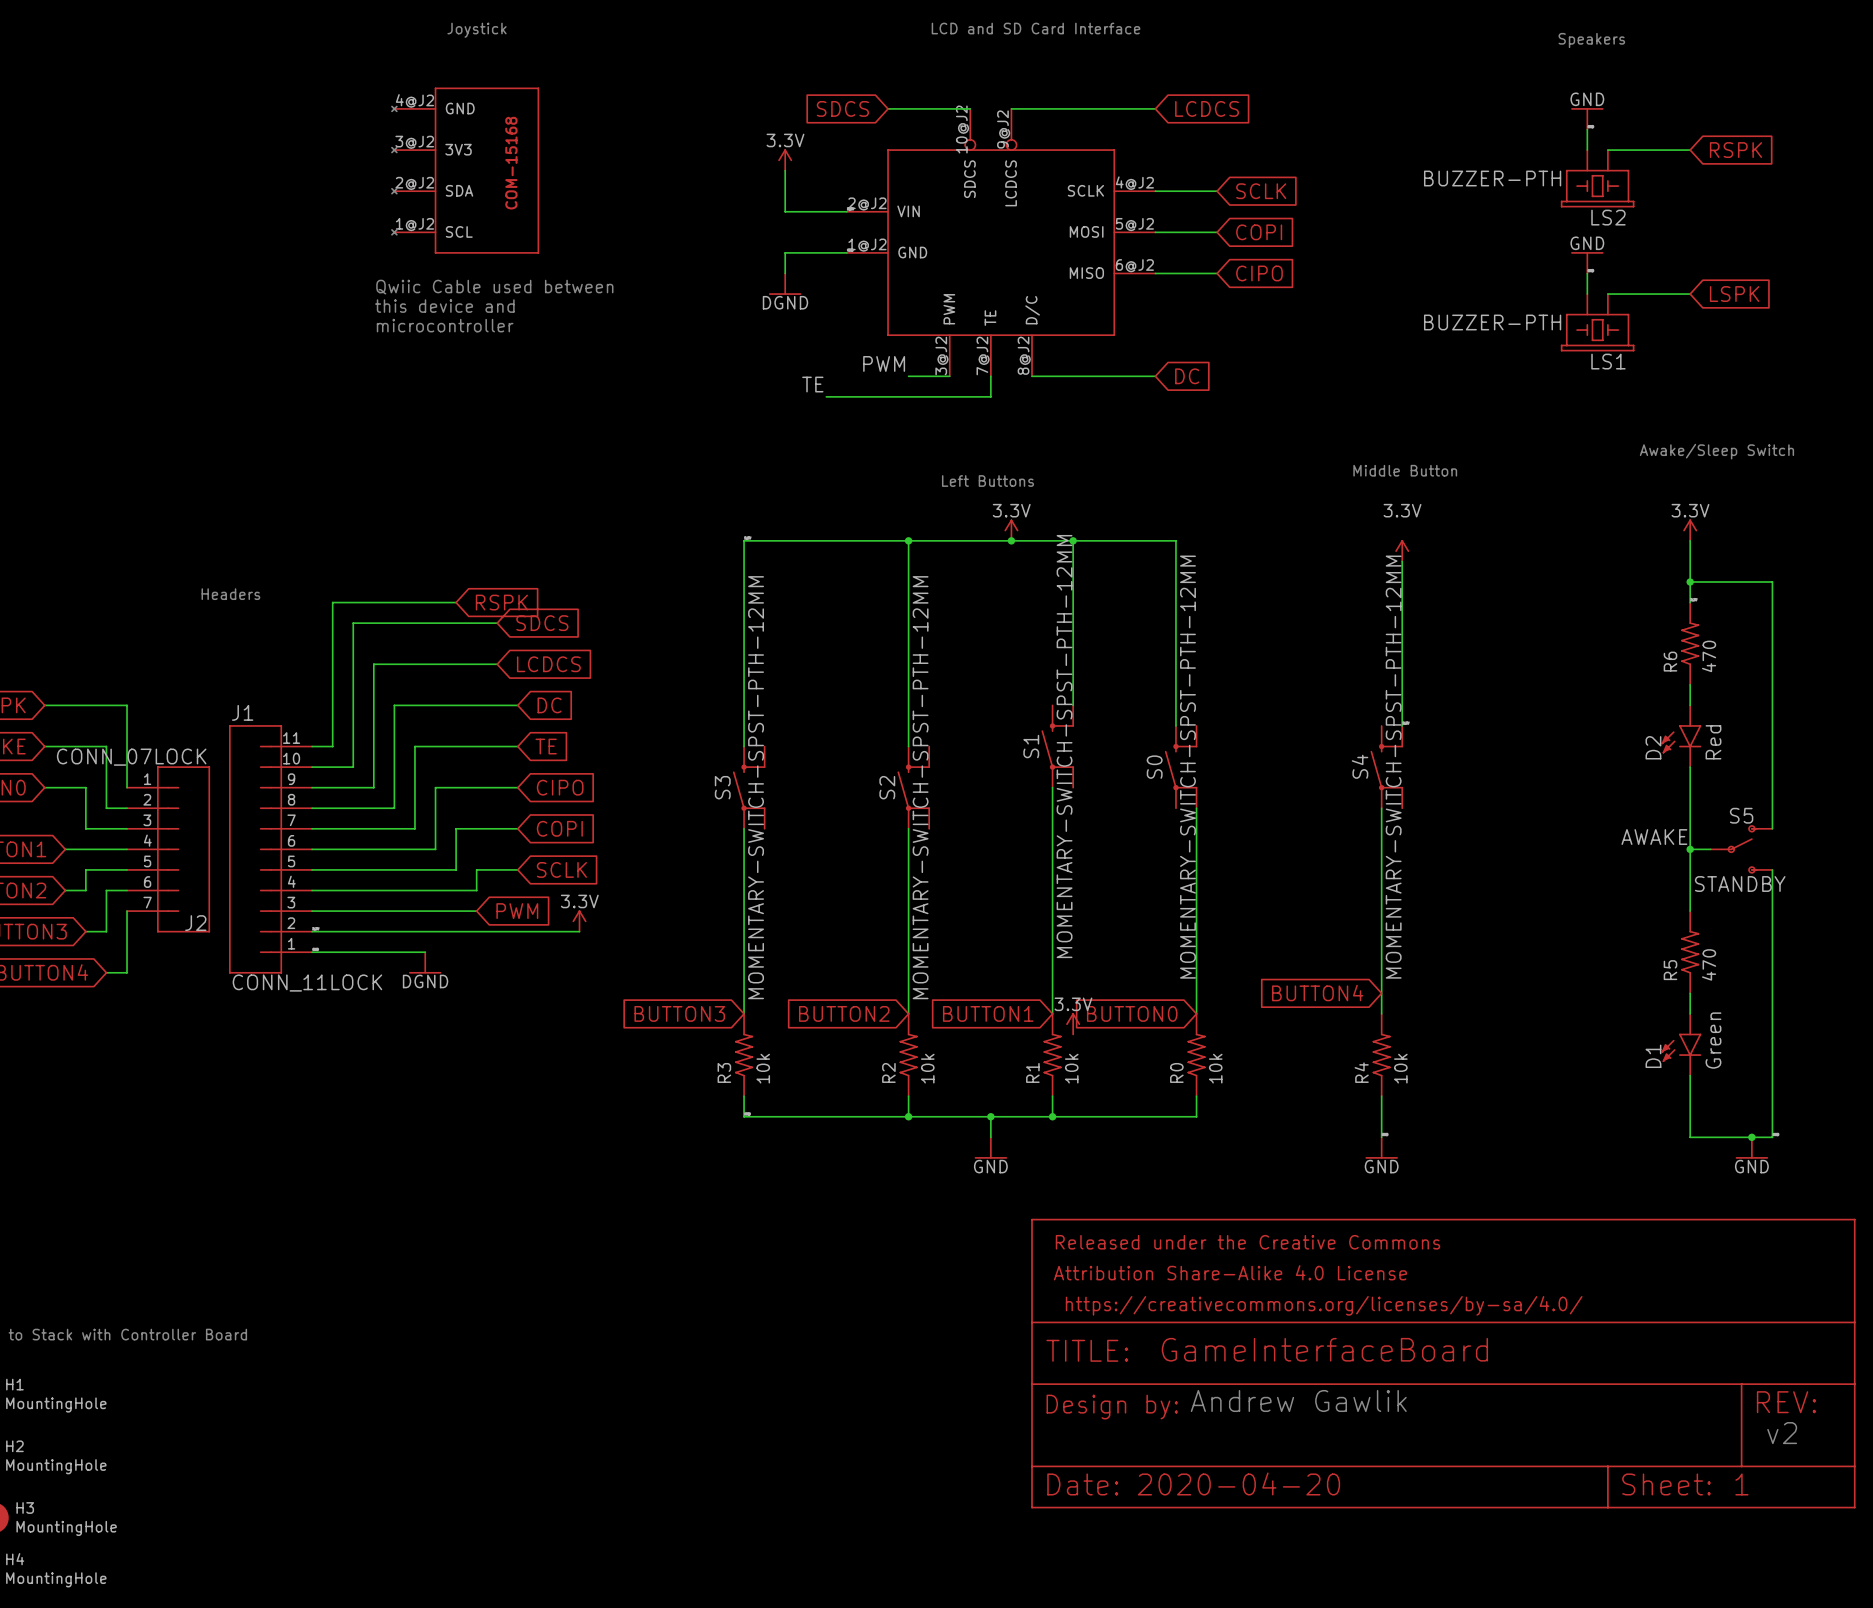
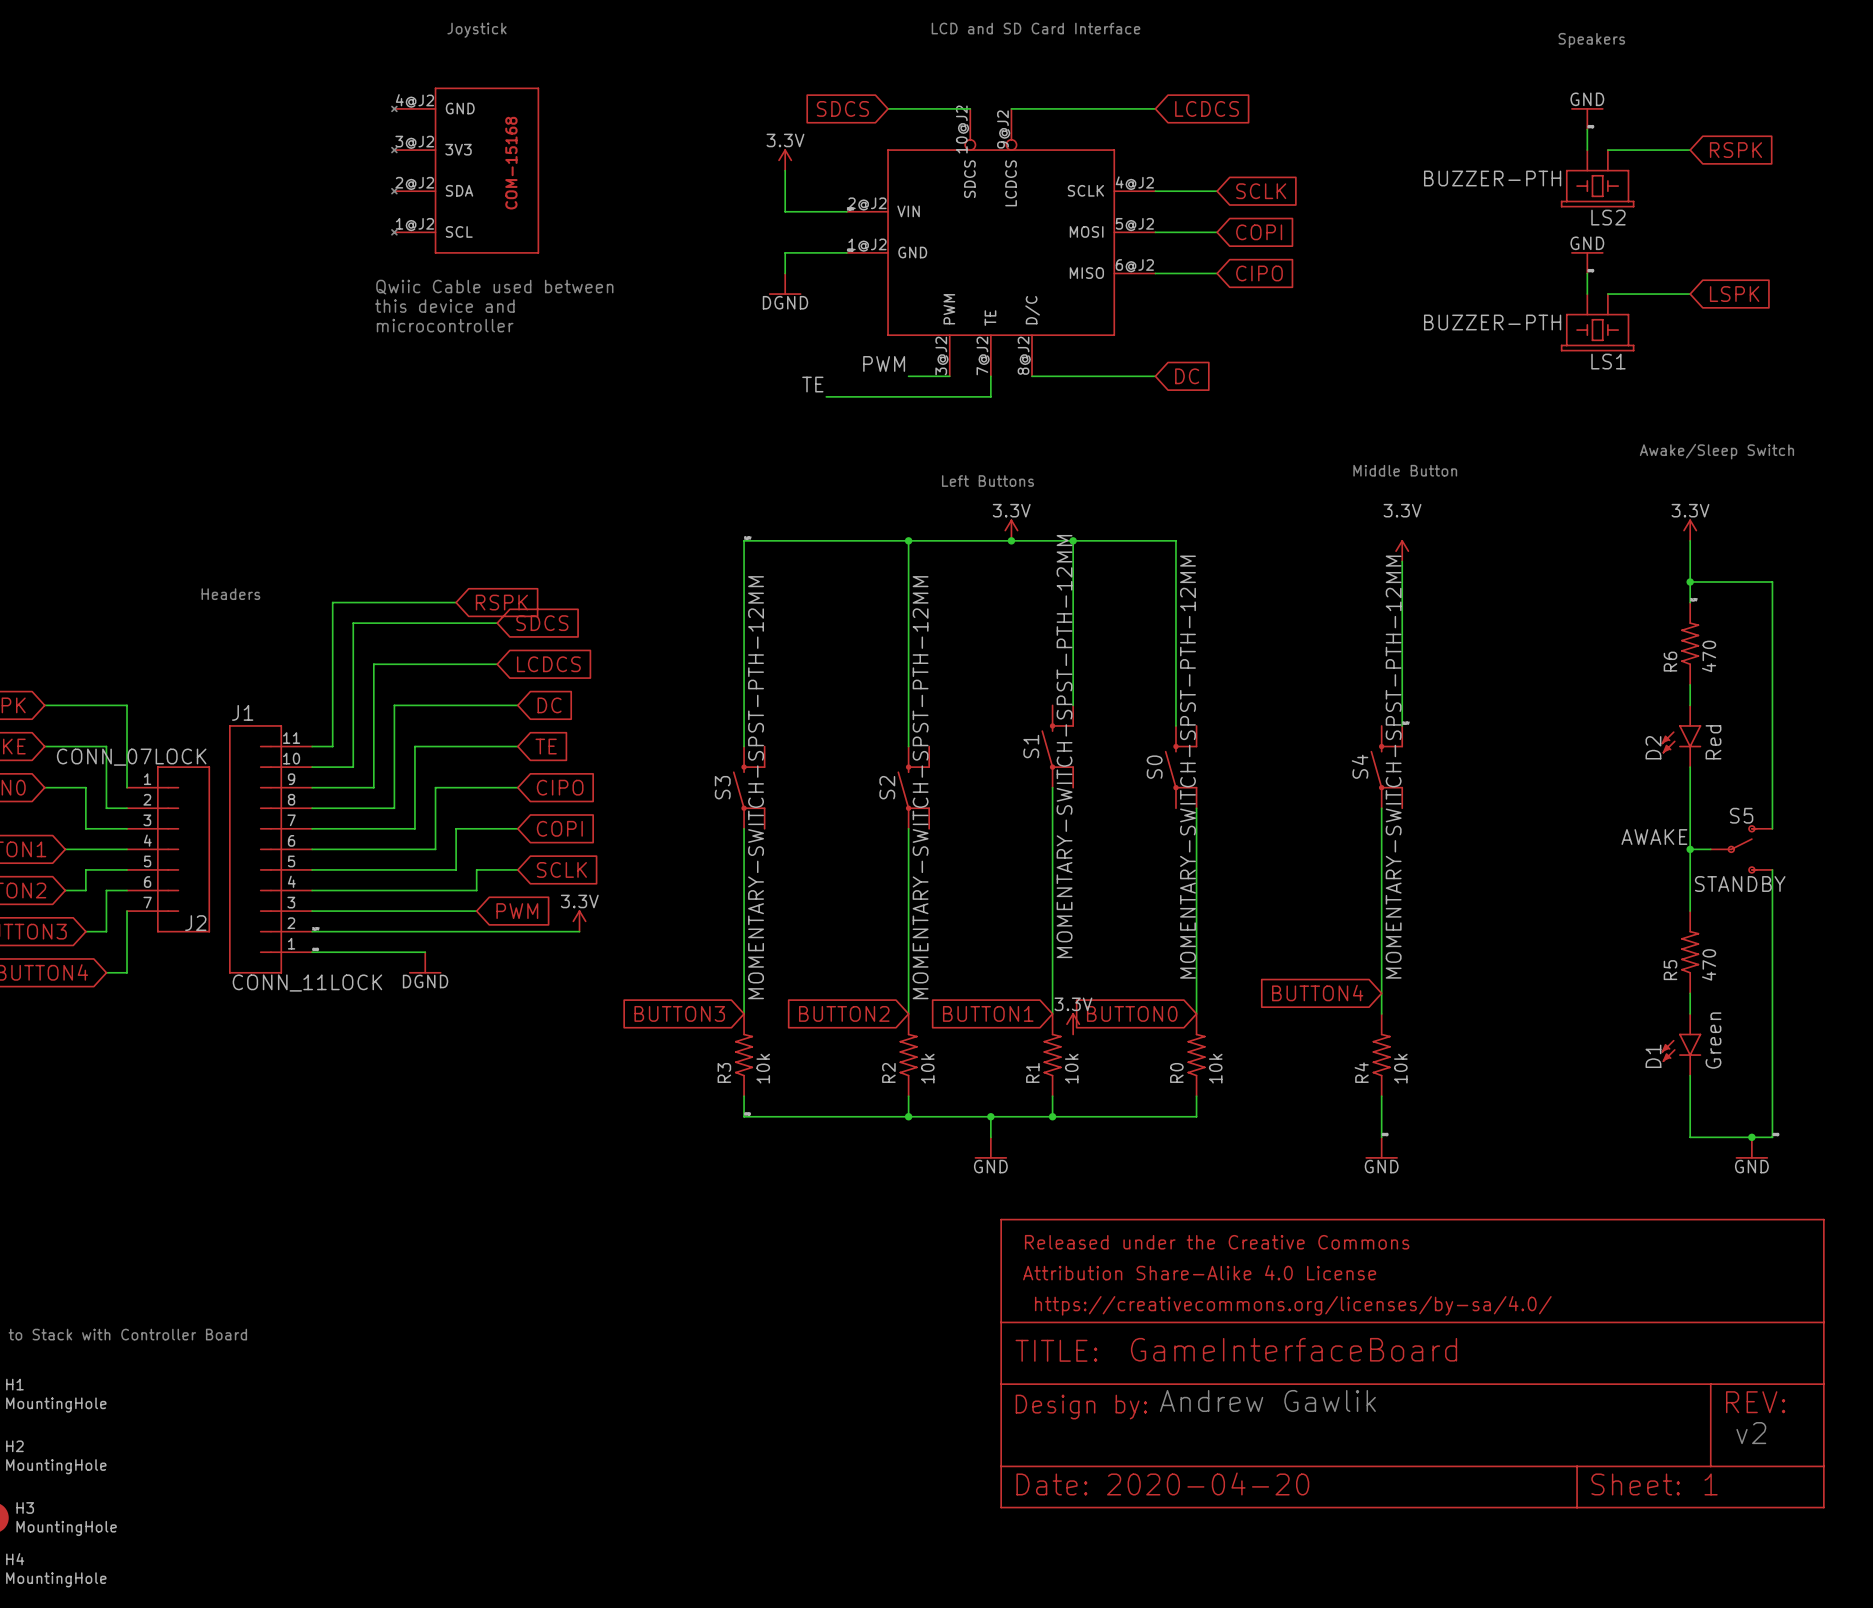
part position: (1443, 1363) -> (1412, 1363)
text position: Andrew Gawlik (1298, 1400) -> Andrew Gawlik (1267, 1400)
text position: v2 (1782, 1433) -> v2 (1751, 1433)

